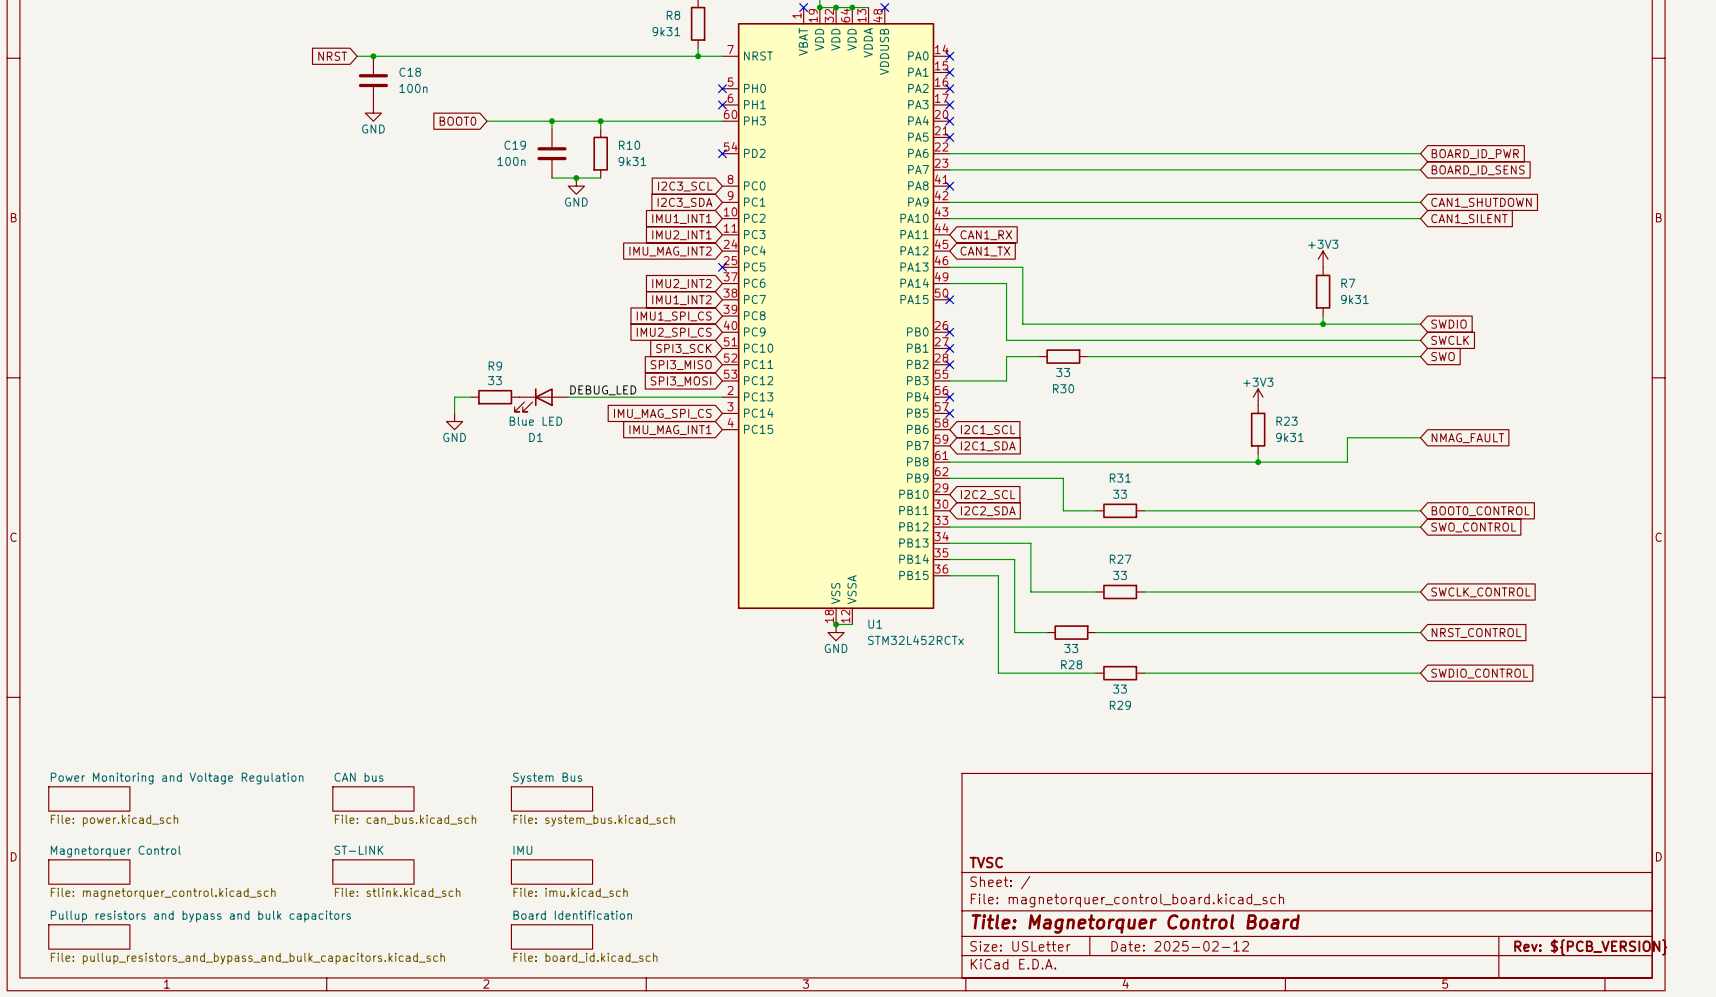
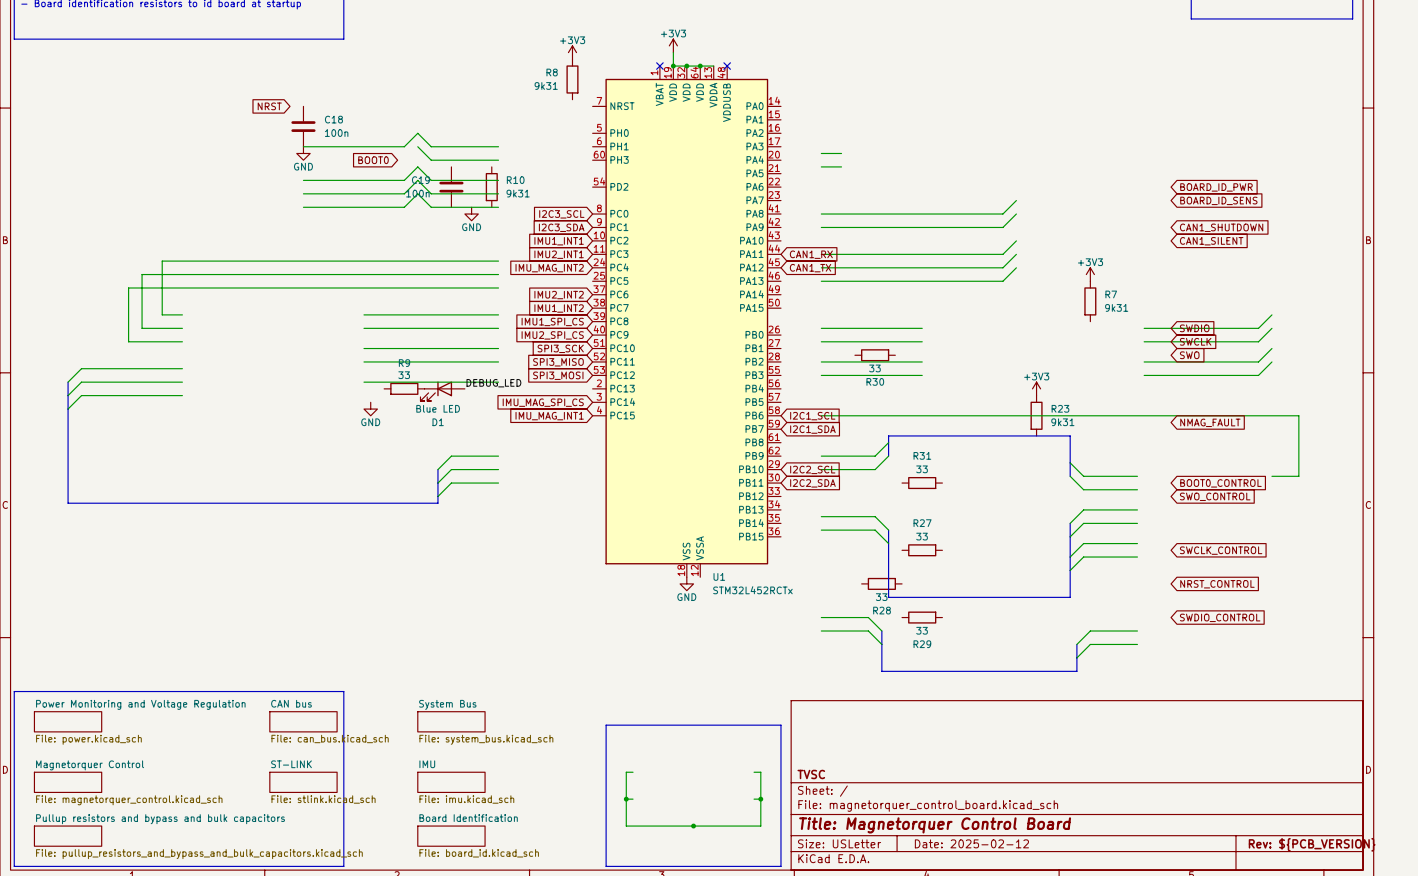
wire: (698, 48) (698, 56) -> none
wire: (357, 56) (722, 56) -> none
junction: (373, 56) -> none
junction: (698, 56) -> none
no-connect mark: (949, 56) -> none
no-connect mark: (949, 72) -> none
no-connect mark: (722, 88) -> none
no-connect mark: (949, 88) -> none
wire: none -> (303, 146) (404, 146) (417, 133) (431, 146) (498, 146)
no-connect mark: (722, 104) -> none
no-connect mark: (949, 104) -> none
wire: none -> (821, 153) (841, 153)
wire: (487, 121) (527, 121) -> (417, 146) (431, 160)
wire: (551, 121) (551, 129) -> none
junction: (551, 121) -> none
wire: (600, 121) (600, 129) -> none
junction: (600, 121) -> none
wire: (608, 121) (722, 121) -> none
no-connect mark: (949, 121) -> none
wire: none -> (821, 166) (841, 166)
no-connect mark: (949, 137) -> none
wire: none -> (303, 180) (404, 180) (417, 166) (431, 180) (498, 180)
no-connect mark: (722, 153) -> none
wire: (949, 153) (1420, 153) -> none
wire: none -> (303, 193) (404, 193) (417, 180) (431, 193) (498, 193)
wire: (949, 169) (1420, 169) -> none
wire: none -> (1016, 200) (1002, 214) (821, 214)
wire: none -> (303, 207) (404, 207) (417, 193) (431, 207) (451, 207)
junction: (576, 178) -> none
wire: none -> (491, 207) (498, 207)
no-connect mark: (949, 186) -> none
wire: (949, 202) (998, 202) -> none
wire: (1217, 202) (1420, 202) -> (1002, 227) (1016, 214)
wire: (949, 218) (1420, 218) -> none
wire: none -> (1016, 240) (1002, 254) (821, 254)
wire: none -> (1016, 254) (1002, 267) (821, 267)
wire: none -> (498, 261) (162, 261) (162, 314) (182, 314)
wire: none -> (1016, 267) (1002, 281) (841, 281)
wire: none -> (498, 274) (142, 274) (142, 328) (182, 328)
no-connect mark: (722, 267) -> none
wire: (949, 267) (998, 267) -> none
wire: (1022, 267) (1022, 324) -> (821, 328) (841, 328)
wire: none -> (498, 287) (128, 287) (128, 341) (182, 341)
wire: (949, 283) (1006, 283) (1006, 340) -> (821, 341) (828, 341)
no-connect mark: (949, 299) -> none
wire: none -> (363, 314) (498, 314)
wire: none -> (1271, 314) (1258, 328) (1171, 328)
wire: (1323, 316) (1323, 324) -> none
wire: none -> (363, 328) (498, 328)
wire: (1120, 324) (1388, 324) -> none
junction: (1323, 324) -> none
wire: none -> (1271, 328) (1258, 341) (1171, 341)
no-connect mark: (949, 332) -> none
wire: (1120, 340) (1388, 340) -> none
wire: none -> (363, 348) (498, 348)
no-connect mark: (949, 348) -> none
wire: none -> (1271, 348) (1258, 361) (1144, 361)
wire: (1039, 356) (1006, 356) (1006, 380) -> (922, 375) (828, 375)
wire: (1087, 356) (1420, 356) -> none
wire: none -> (363, 361) (498, 361)
no-connect mark: (949, 364) -> none
wire: none -> (821, 361) (922, 361)
wire: none -> (1271, 361) (1258, 375) (1144, 375)
wire: none -> (182, 368) (81, 368) (68, 382)
wire: (949, 380) (998, 380) -> none
bus: none -> (68, 382) (68, 503) (437, 503) (437, 469)
wire: none -> (182, 382) (81, 382) (68, 395)
wire: none -> (363, 382) (498, 382)
wire: (470, 397) (454, 397) (454, 413) -> none
wire: (568, 397) (722, 397) -> none
no-connect mark: (949, 397) -> none
wire: none -> (182, 395) (81, 395) (68, 409)
no-connect mark: (949, 413) -> none
wire: none -> (821, 415) (1298, 415) (1298, 476) (1271, 476)
wire: (1420, 437) (1347, 437) (1347, 462) (949, 462) -> none
wire: (1258, 454) (1258, 462) -> none
junction: (1258, 462) -> none
wire: none -> (498, 456) (451, 456) (437, 469)
wire: (949, 478) (998, 478) -> none
wire: (1063, 478) (1063, 510) (1095, 510) -> (875, 456) (888, 442)
wire: none -> (888, 456) (875, 469) (821, 469)
bus: none -> (888, 456) (888, 435) (1070, 435) (1070, 476)
wire: none -> (1070, 462) (1083, 476) (1137, 476)
wire: none -> (498, 469) (451, 469) (437, 483)
wire: none -> (1070, 476) (1083, 489) (1137, 489)
wire: none -> (498, 483) (451, 483) (437, 496)
wire: (1144, 510) (1420, 510) -> none
wire: (949, 527) (1420, 527) -> none
wire: (949, 543) (1030, 543) (1030, 591) (1095, 591) -> none
wire: none -> (1137, 509) (1083, 509) (1070, 523)
wire: none -> (821, 516) (875, 516) (888, 530)
wire: (949, 559) (1014, 559) (1014, 632) (1047, 632) -> none
bus: none -> (1070, 523) (1070, 597) (888, 597) (888, 530)
wire: none -> (1137, 523) (1083, 523) (1070, 536)
wire: none -> (821, 530) (875, 530) (888, 543)
wire: (949, 575) (998, 575) (998, 673) -> none
wire: none -> (1137, 543) (1083, 543) (1070, 557)
wire: (1144, 591) (1420, 591) -> none
wire: none -> (1137, 557) (1083, 557) (1070, 570)
wire: (836, 624) (852, 624) -> none
junction: (836, 624) -> none
wire: (1095, 632) (1420, 632) -> none
wire: (1055, 673) (1095, 673) -> (868, 617) (881, 631)
wire: (1144, 673) (1420, 673) -> none
wire: none -> (821, 631) (868, 631) (881, 644)
bus: none -> (881, 631) (881, 671) (1076, 671) (1076, 644)
wire: none -> (1137, 631) (1090, 631) (1076, 644)
wire: none -> (1137, 644) (1090, 644) (1076, 657)
line: none -> (14, 691) (343, 691) (343, 866) (14, 866) (14, 691)
line: none -> (606, 725) (780, 725) (780, 866) (606, 866) (606, 725)
wire: none -> (633, 772) (626, 772) (626, 826) (760, 826) (760, 772) (754, 772)
wire: none -> (626, 799) (633, 799)
junction: none -> (626, 799)
wire: none -> (754, 799) (760, 799)
junction: none -> (760, 799)
junction: none -> (693, 826)

